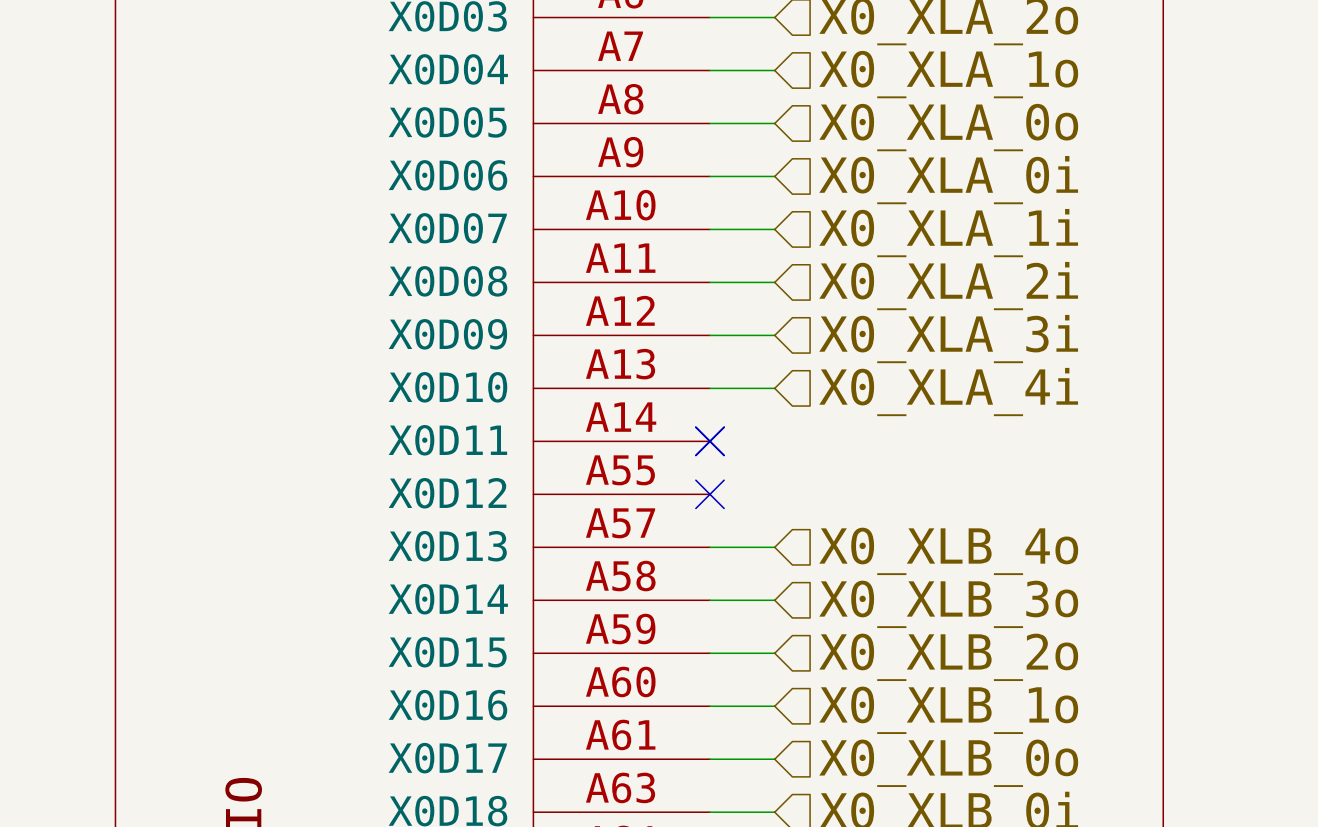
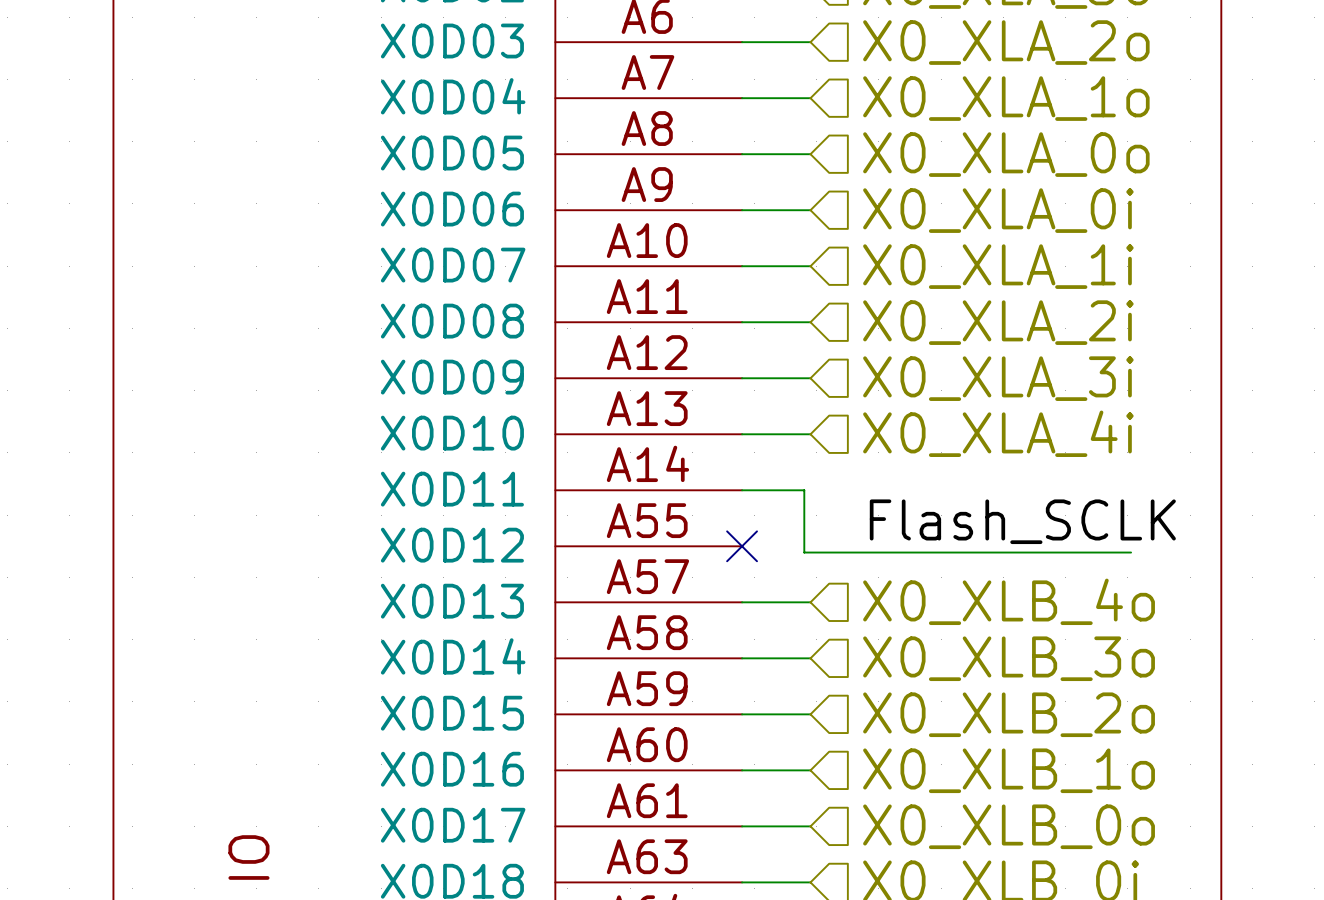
wire: none -> (742, 490) (804, 490) (804, 552) (1131, 552)
no-connect mark: (709, 441) -> none
label: none -> Flash_SCLK (1022, 521)

